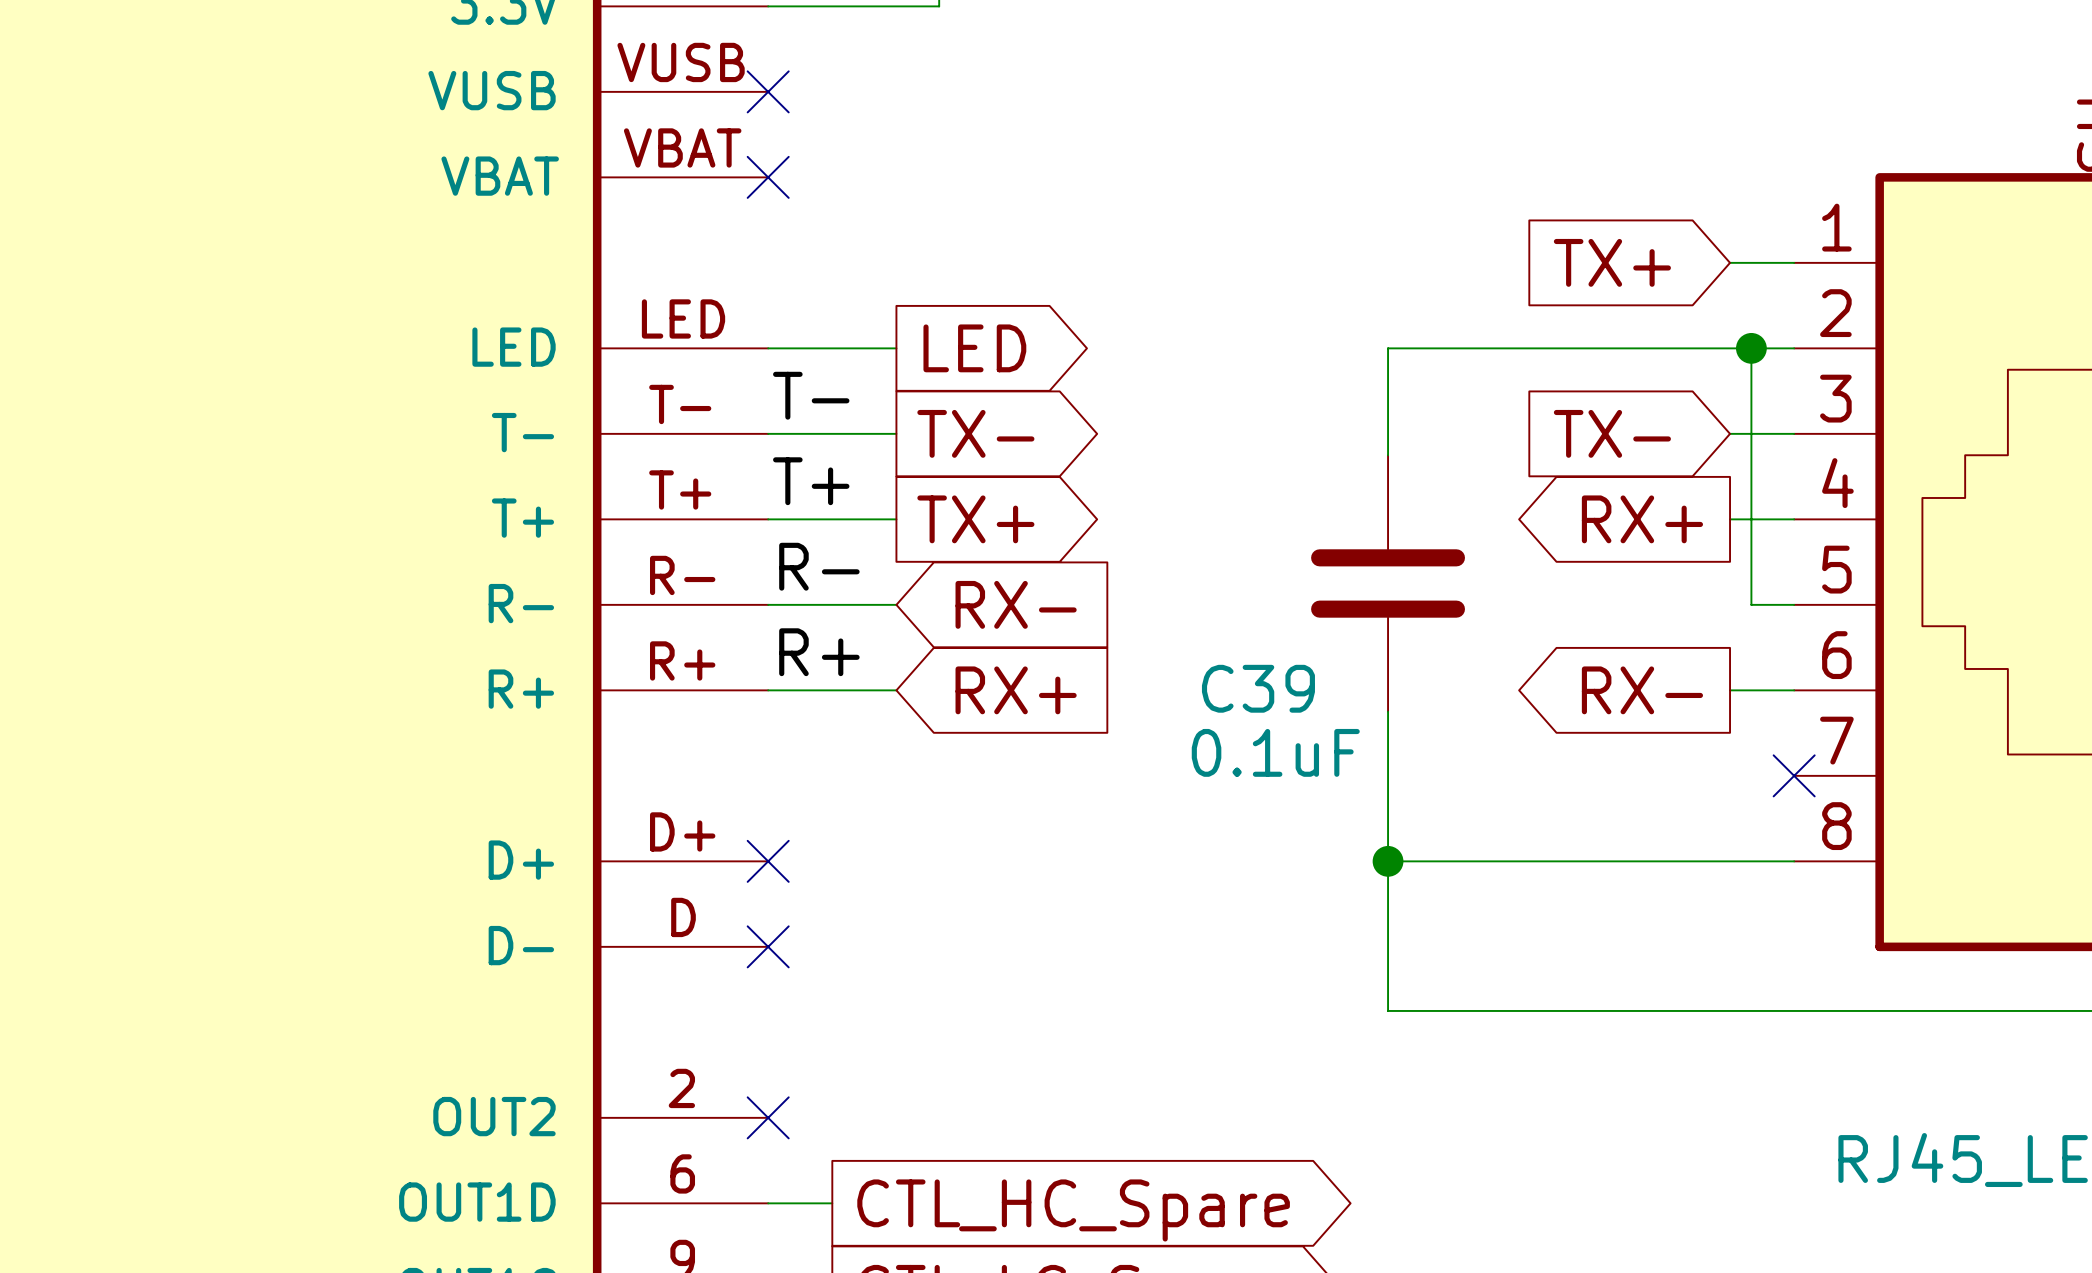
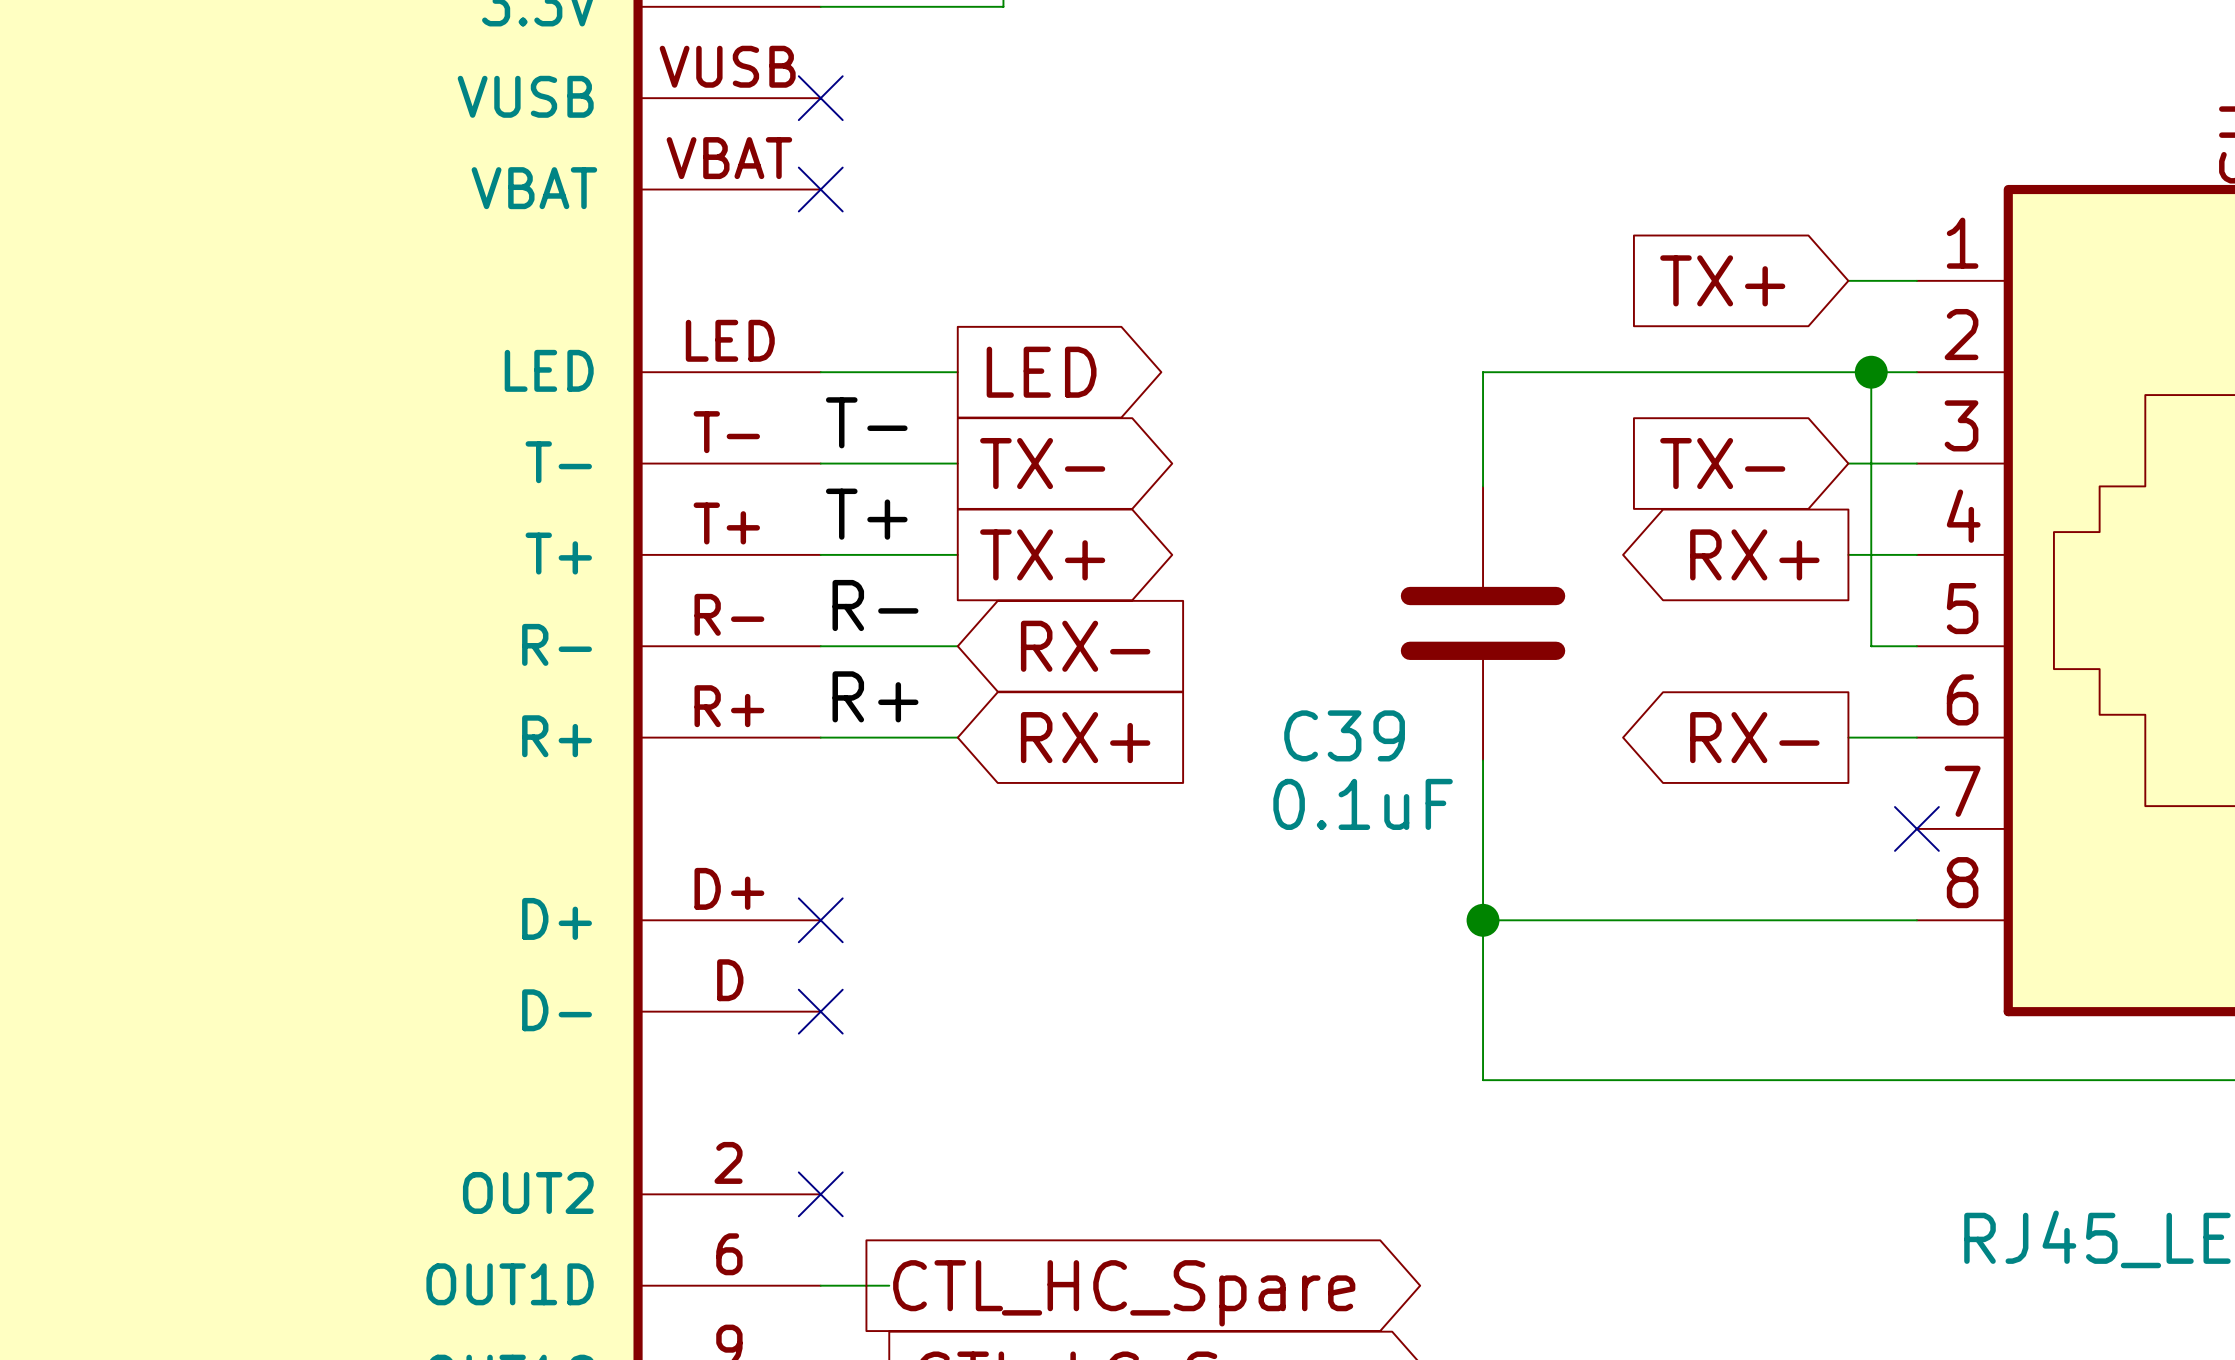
global label position: CTL_HC_Spare (1073, 1210) -> CTL_HC_Spare (1124, 1293)

